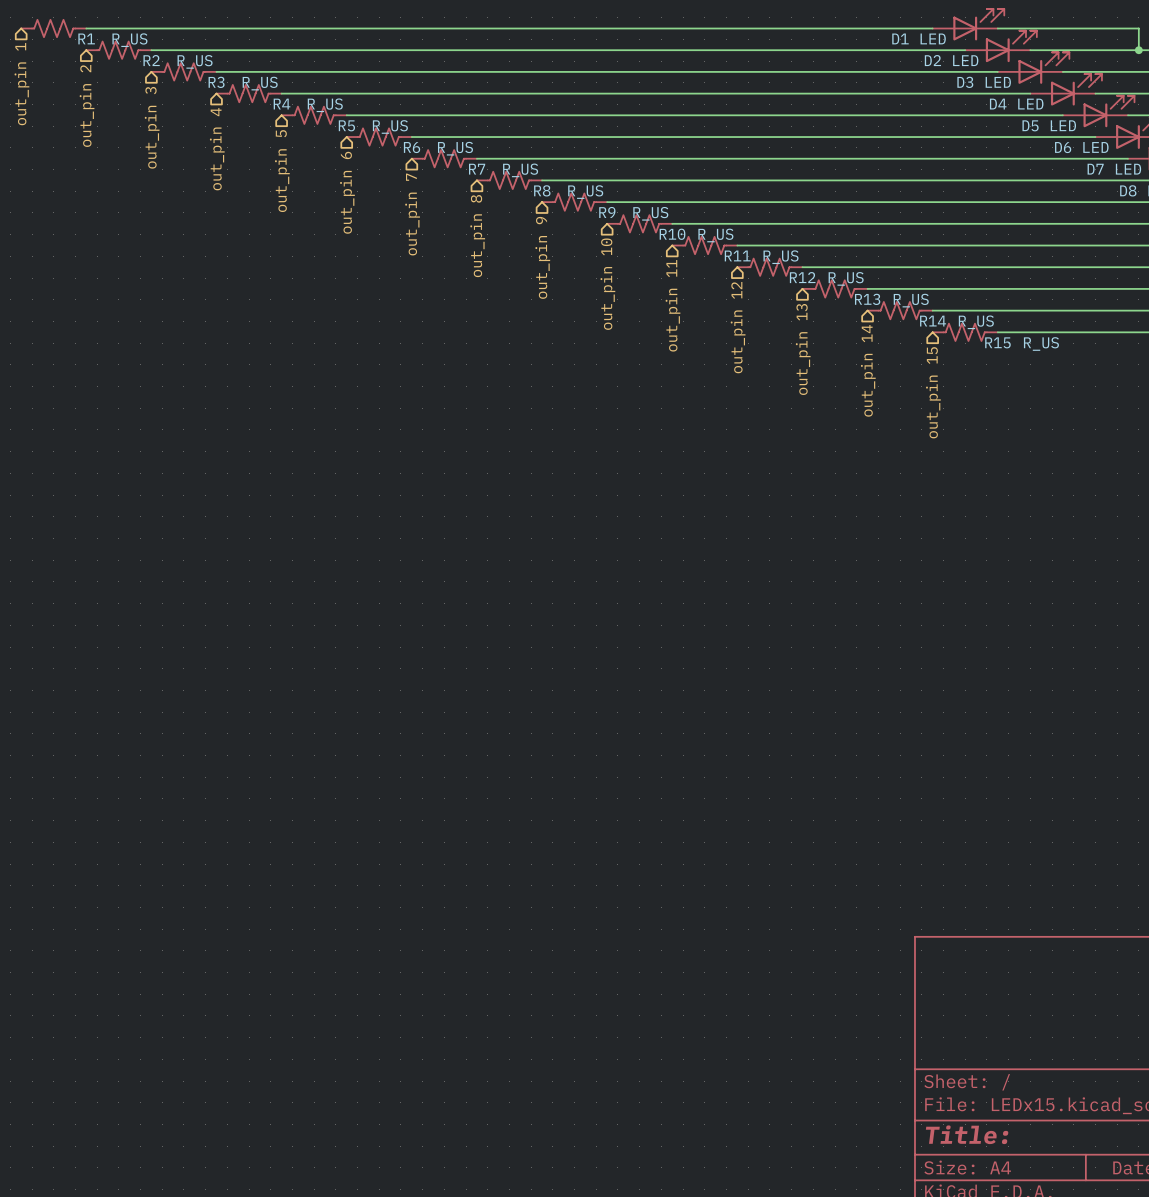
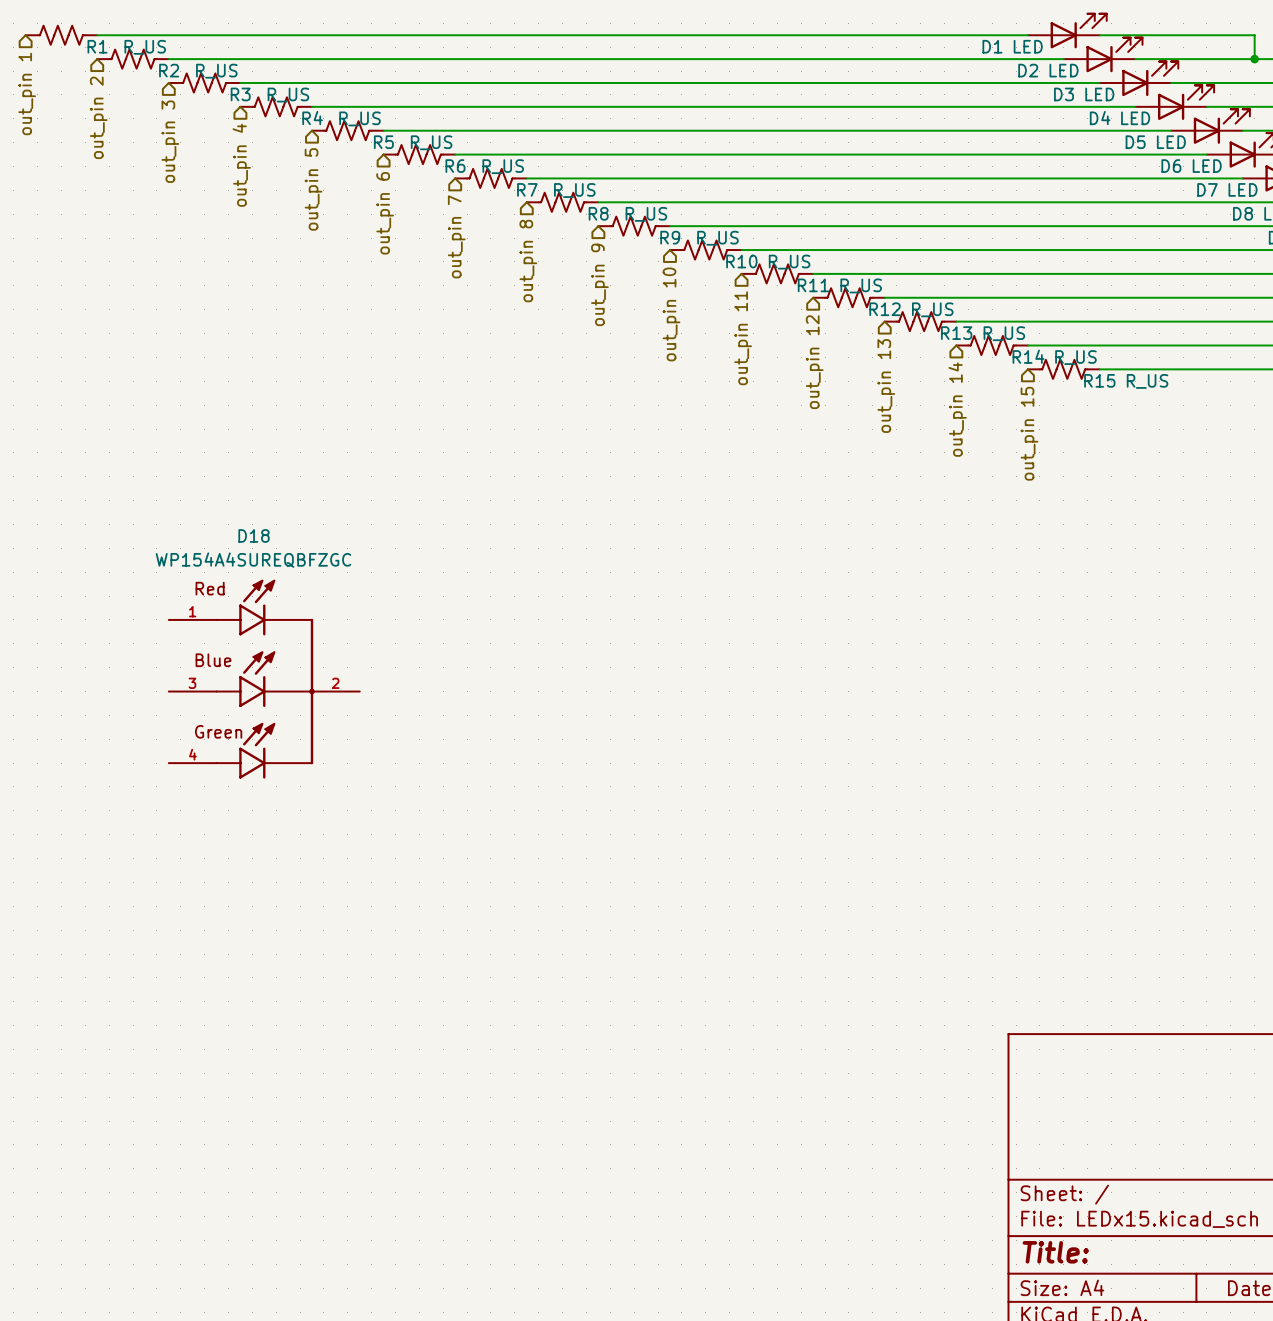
D18: none -> WP154A4SUREQBFZGC (264, 679)

